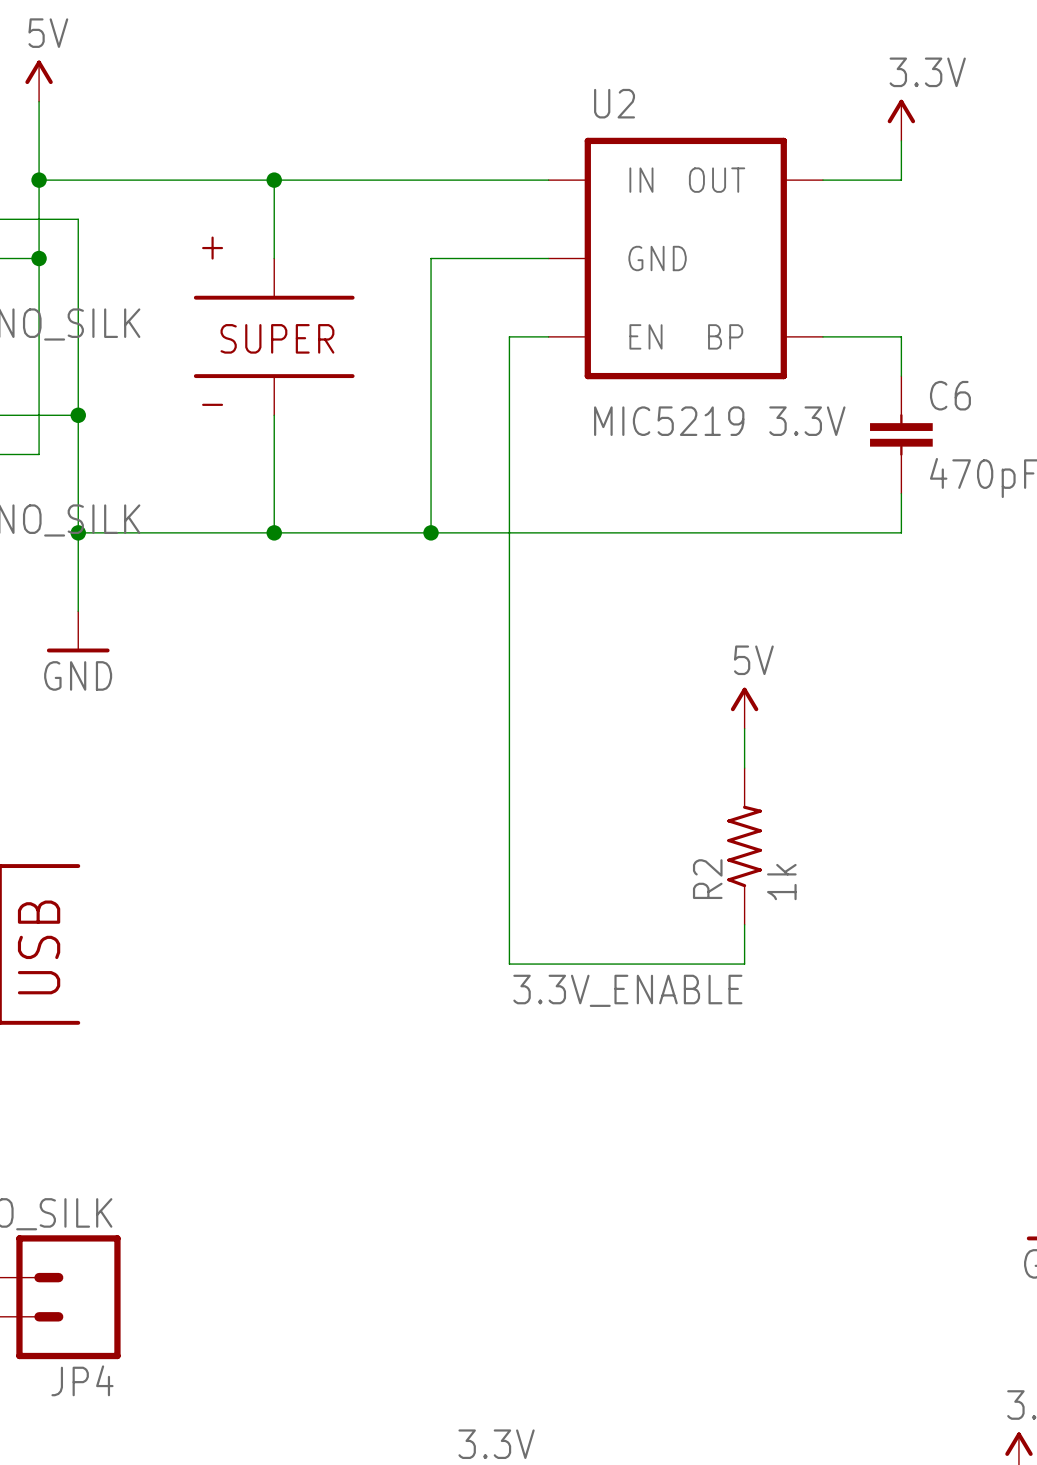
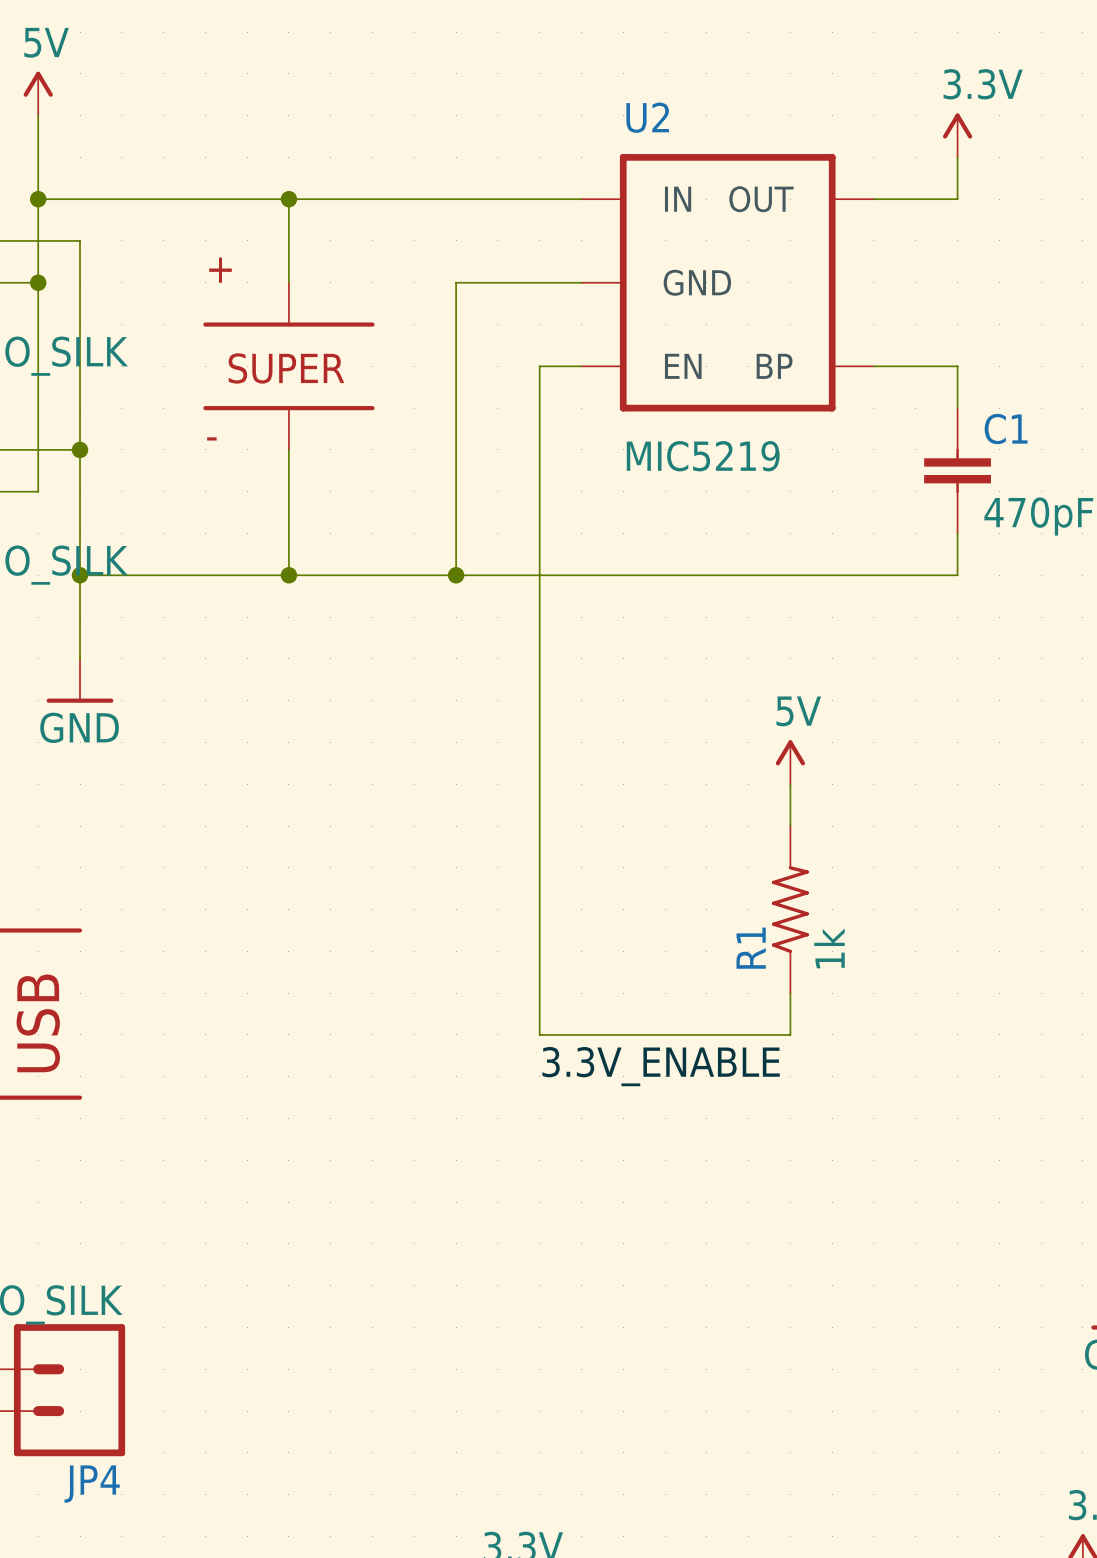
C6 name: C6 (950, 395) -> C1 (1006, 429)
U2 value: MIC5219 3.3V (719, 421) -> MIC5219 (703, 456)
R2 name: R2 (707, 879) -> R1 (751, 948)

